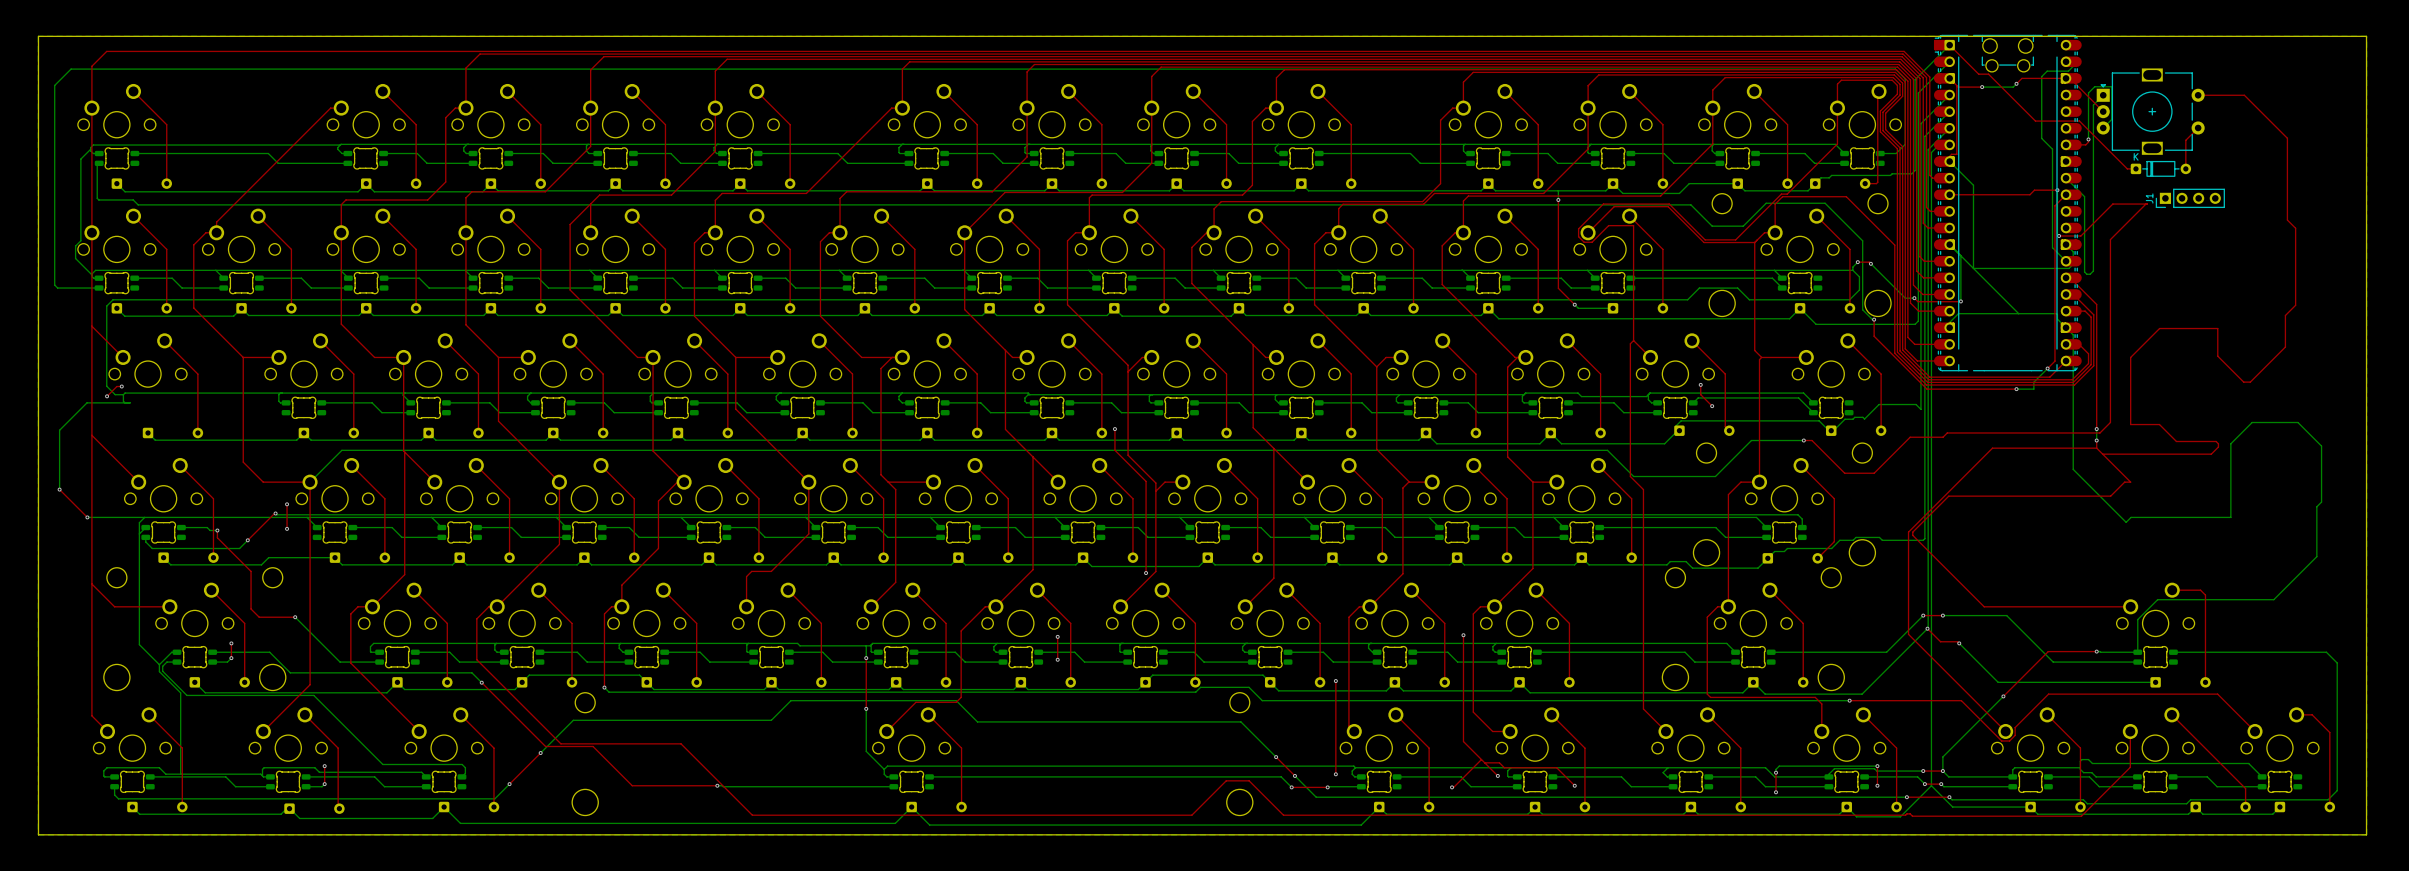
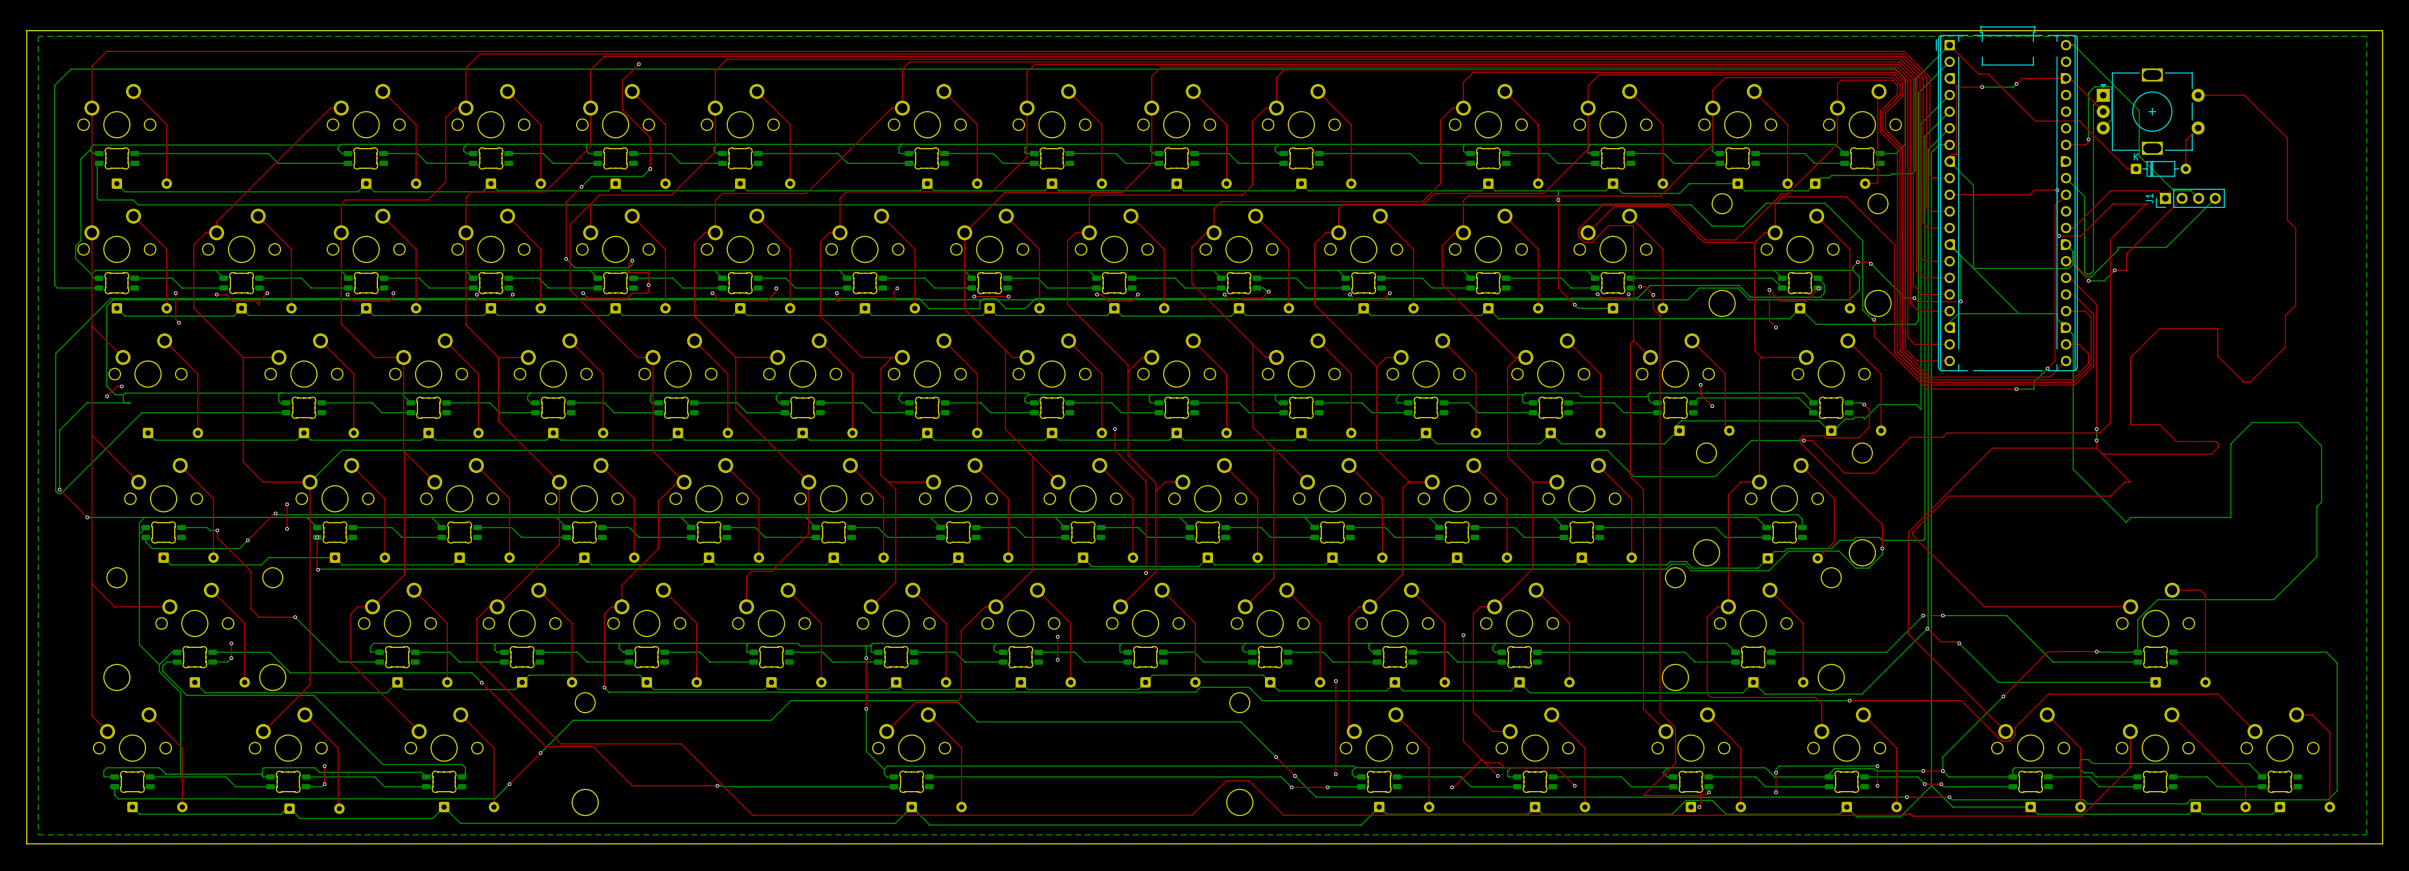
part footprint: [1933, 35, 2082, 372] -> [1935, 26, 2078, 372]
board edge: (38, 36) (2366, 36) (2366, 834) (38, 834) (38, 36) -> (26, 30) (26, 843) (2382, 843) (2382, 30) (26, 30)
bottom track: none -> (2066, 45) (2073, 45) (2139, 110) (2139, 156) (2173, 190) (2191, 190) (2198, 198)
top track: none -> (638, 64) (622, 80) (622, 110) (650, 137) (650, 168)
via: none -> (638, 64)
bottom track: (2073, 66) (2068, 71) (2047, 71) (2041, 76) (2041, 138) (2052, 149) (2052, 247) (2066, 261) -> none
bottom track: none -> (650, 168) (642, 176) (592, 176) (581, 186)
via: none -> (650, 168)
top track: none -> (581, 186) (566, 202) (566, 258)
via: none -> (581, 186)
top track: none -> (2165, 198) (2157, 190) (2110, 190) (2073, 228) (2066, 228)
top track: none -> (2182, 198) (2126, 253) (2126, 270) (2114, 270)
bottom track: none -> (2215, 198) (2166, 247) (2117, 247) (2117, 250) (2091, 276) (2085, 276) (2073, 264)
bottom track: none -> (566, 258) (575, 267) (629, 267) (632, 264) (632, 260)
via: none -> (566, 258)
top track: none -> (632, 260) (628, 263) (628, 272) (648, 271) (648, 291) (647, 293) (632, 293) (627, 298) (586, 298) (583, 293)
via: none -> (632, 260)
top track: none -> (2066, 261) (2071, 261) (2088, 280)
bottom track: none -> (2114, 270) (2104, 280) (2088, 280)
via: none -> (2114, 270)
bottom track: none -> (1817, 278) (1824, 284) (1824, 293) (1820, 297) (1750, 297) (1738, 285) (1650, 285) (1637, 298) (1035, 298) (1025, 308) (1005, 308) (995, 298) (983, 298) (979, 302) (979, 308) (929, 308) (918, 298) (110, 298) (55, 353) (55, 491) (61, 493) (142, 412) (286, 412)
via: none -> (2088, 280)
via: none -> (648, 285)
top track: none -> (1640, 286) (1645, 286) (1653, 294) (1653, 308) (1659, 315) (1659, 712) (1675, 727) (1675, 763) (1643, 795) (1700, 795)
via: none -> (1640, 286)
top track: none -> (776, 288) (776, 291) (766, 301) (720, 301) (712, 293)
via: none -> (776, 288)
top track: none -> (897, 288) (894, 291) (894, 299) (840, 299) (838, 301) (836, 293)
via: none -> (897, 288)
bottom track: none -> (1256, 288) (1263, 288) (1268, 291)
top track: none -> (1818, 288) (1805, 301) (1780, 301) (1769, 289) (1769, 321) (1776, 327)
via: none -> (1818, 288)
via: none -> (1769, 289)
top track: none -> (1268, 291) (1262, 298) (1242, 298) (1240, 299) (1229, 299) (1224, 294)
via: none -> (1268, 291)
top track: none -> (175, 293) (175, 319) (179, 322)
via: none -> (175, 293)
top track: none -> (267, 293) (259, 301) (259, 305) (255, 301) (232, 301) (226, 294) (216, 294)
via: none -> (267, 293)
top track: none -> (393, 293) (393, 296) (388, 301) (353, 301) (347, 294)
via: none -> (393, 293)
via: none -> (583, 293)
via: none -> (712, 293)
via: none -> (836, 293)
top track: none -> (1389, 293) (1383, 299) (1355, 299) (1349, 294)
via: none -> (1389, 293)
via: none -> (216, 294)
via: none -> (347, 294)
top track: none -> (476, 294) (478, 299) (507, 299) (512, 294)
via: none -> (476, 294)
via: none -> (512, 294)
top track: none -> (1096, 294) (1101, 294) (1108, 301) (1131, 301) (1137, 294)
via: none -> (1096, 294)
via: none -> (1137, 294)
via: none -> (1224, 294)
via: none -> (1349, 294)
via: none -> (1597, 294)
top track: none -> (1628, 294) (1627, 298) (1601, 298) (1597, 294)
via: none -> (1628, 294)
via: none -> (1653, 294)
top track: none -> (974, 296) (1008, 296)
via: none -> (974, 296)
via: none -> (1008, 296)
via: none -> (179, 322)
via: none -> (1776, 327)
top track: none -> (2066, 344) (2079, 344)
bottom track: none -> (1849, 402) (1864, 404)
top track: none -> (1864, 404) (1869, 409) (1869, 427) (1858, 437) (1802, 435) (1799, 442) (1882, 524) (1882, 548)
via: none -> (1864, 404)
top track: none -> (317, 537) (317, 568) (319, 569)
via: none -> (317, 537)
bottom track: none -> (1882, 548) (1882, 554) (1868, 568) (1856, 568) (1839, 551) (1788, 551) (1768, 570) (1691, 570) (1684, 564) (1671, 564) (1666, 569) (318, 569)
via: none -> (1882, 548)
via: none -> (318, 569)
top track: none -> (1708, 792) (1706, 794) (1700, 794) (1699, 807)
via: none -> (1708, 792)
via: none -> (1699, 807)
bottom track: (1672, 814) (1683, 814) (1690, 807) (1698, 814) (1725, 814) -> (1672, 814) (1686, 800) (1712, 800) (1725, 814)

